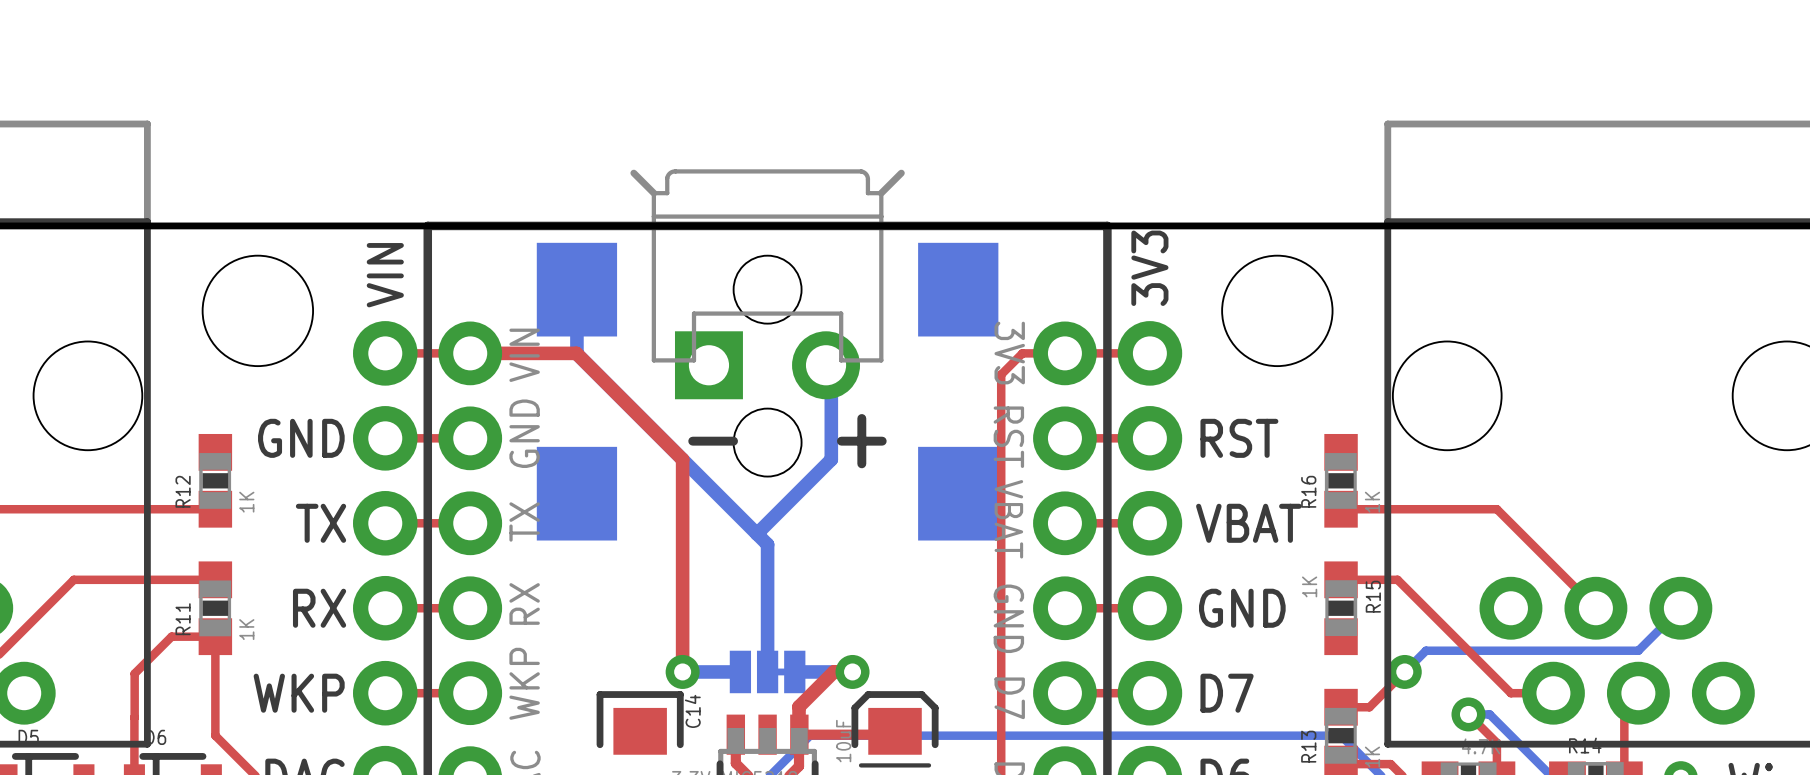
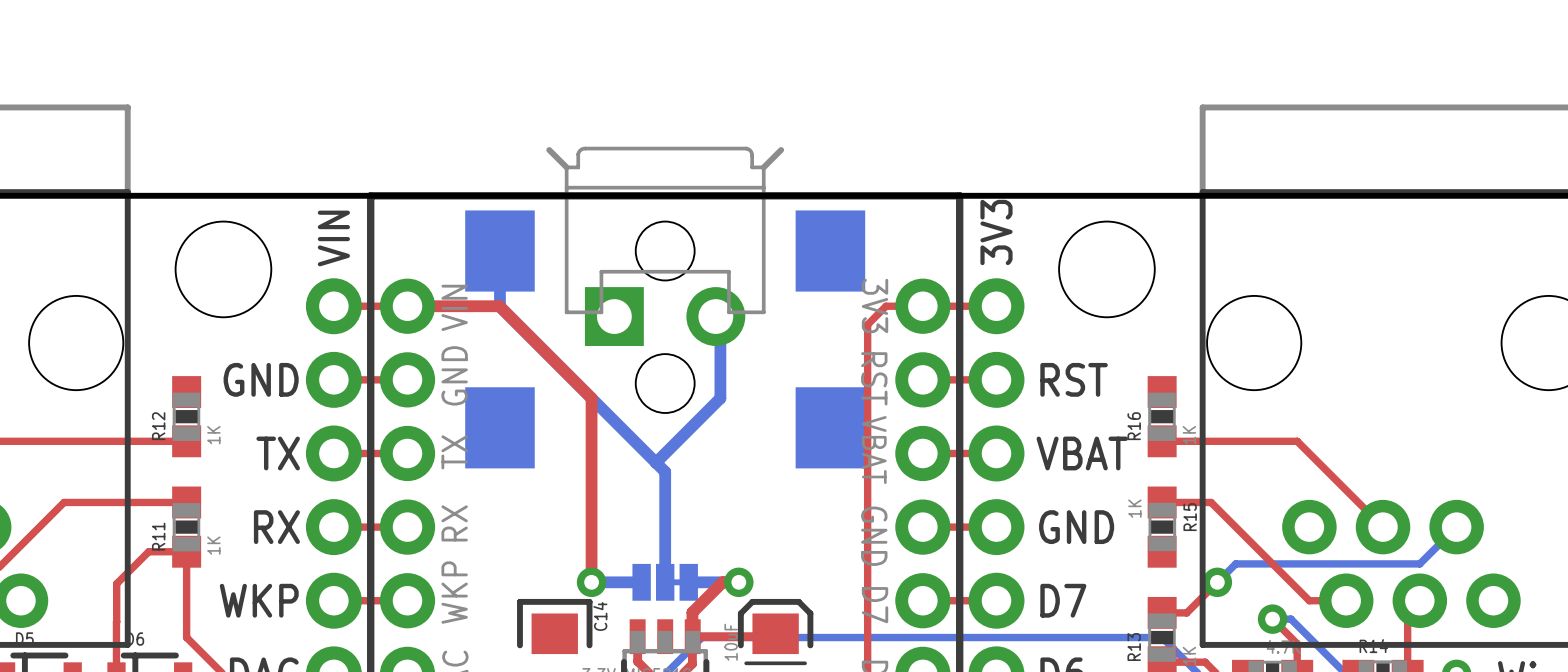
text: - (713, 441) -> none
text: + (861, 441) -> none

